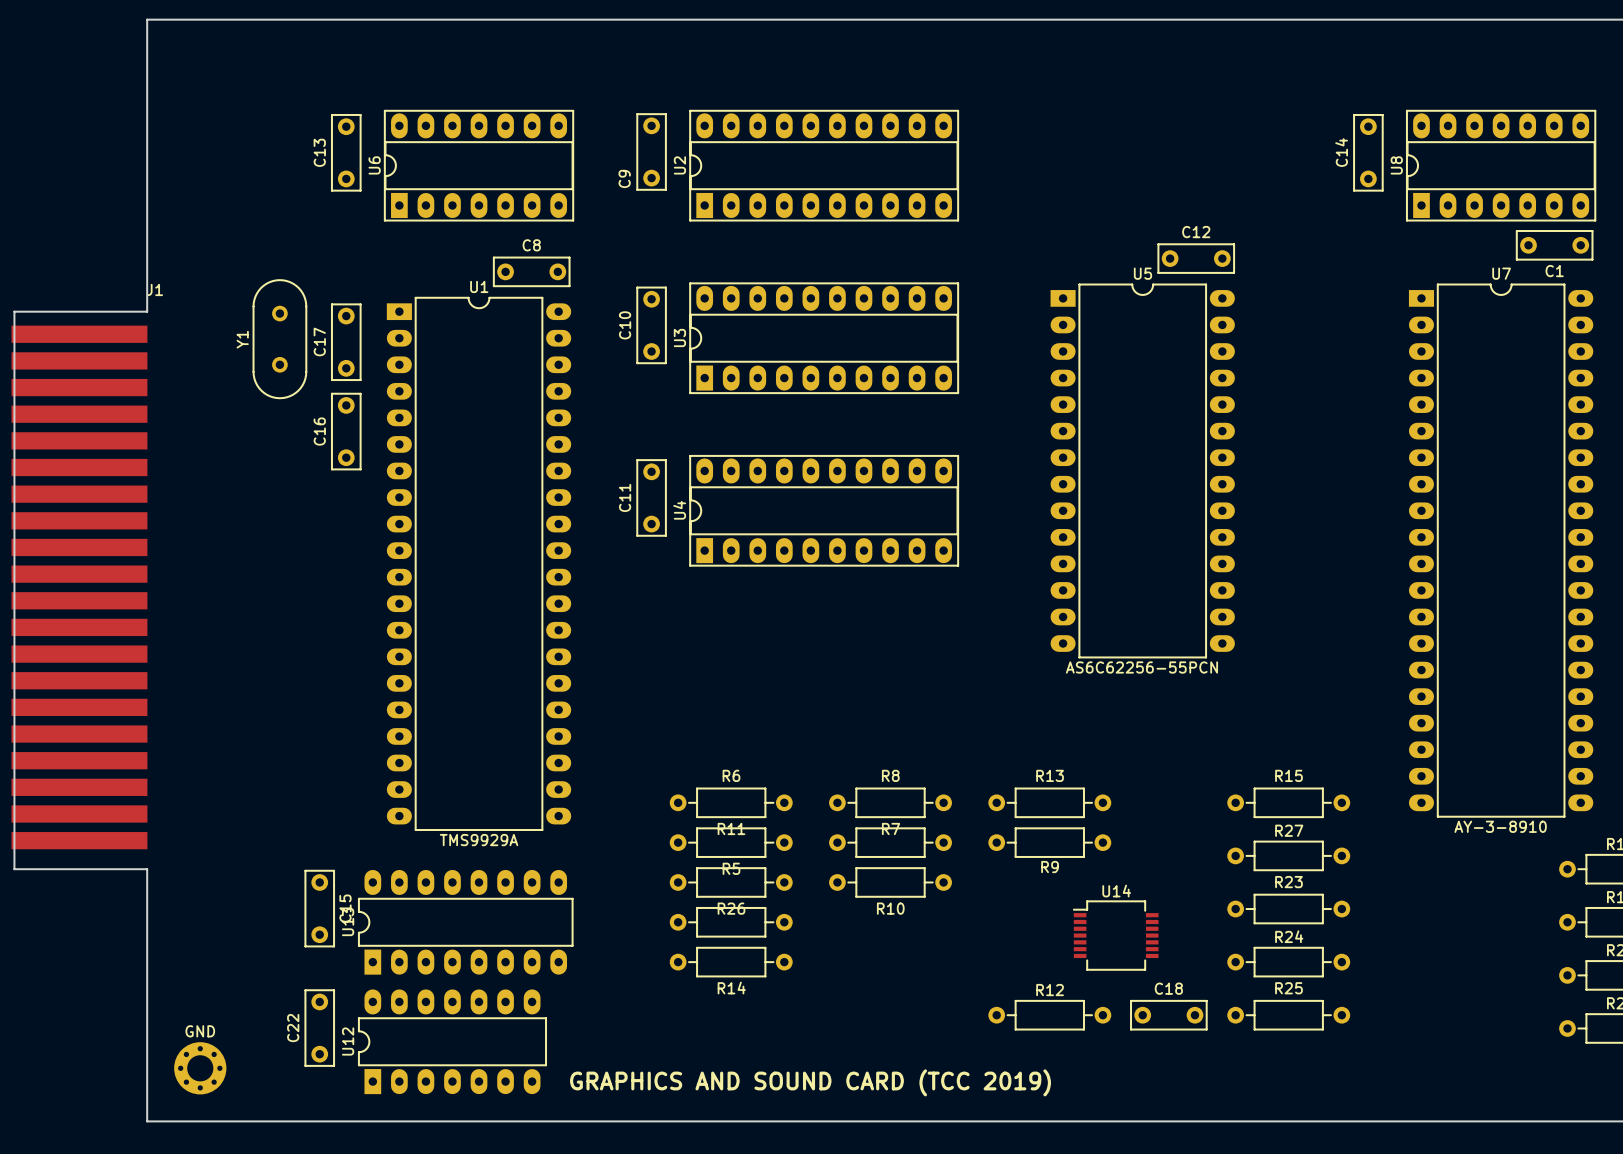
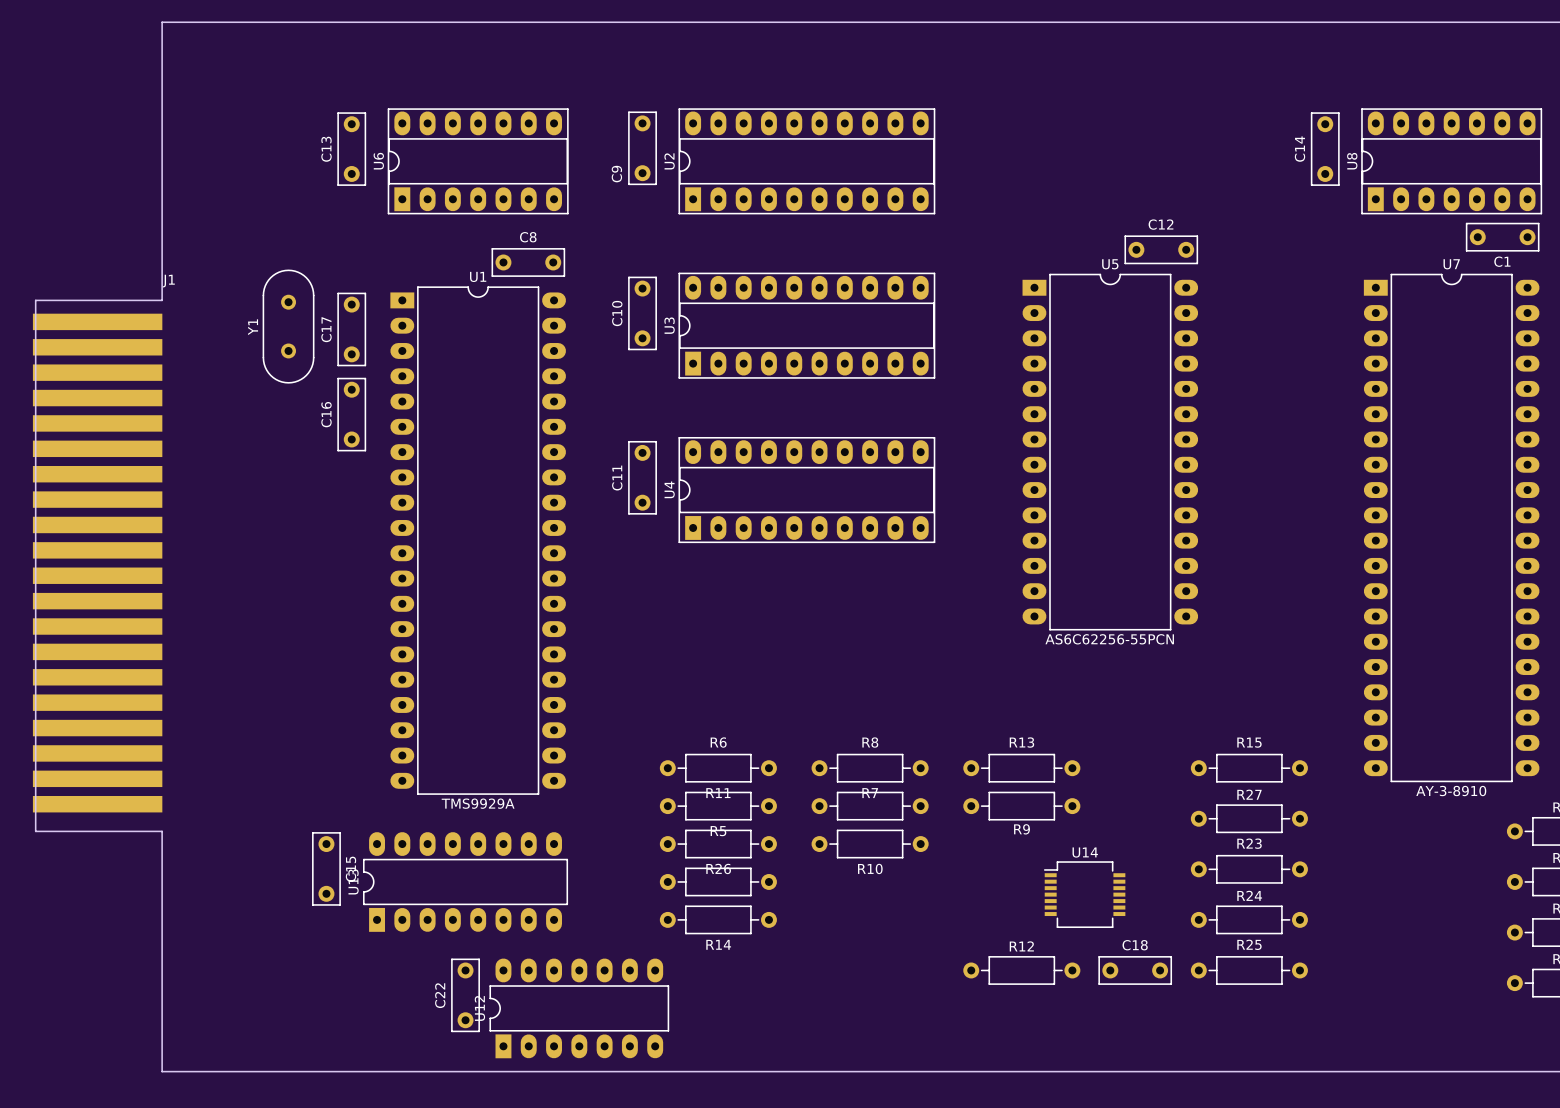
C22 position: (319, 1028) -> (465, 995)
U12 position: (452, 1041) -> (579, 1008)
GND: (200, 1068) -> none
text: GRAPHICS AND SOUND CARD (TCC 2019) (810, 1082) -> none

